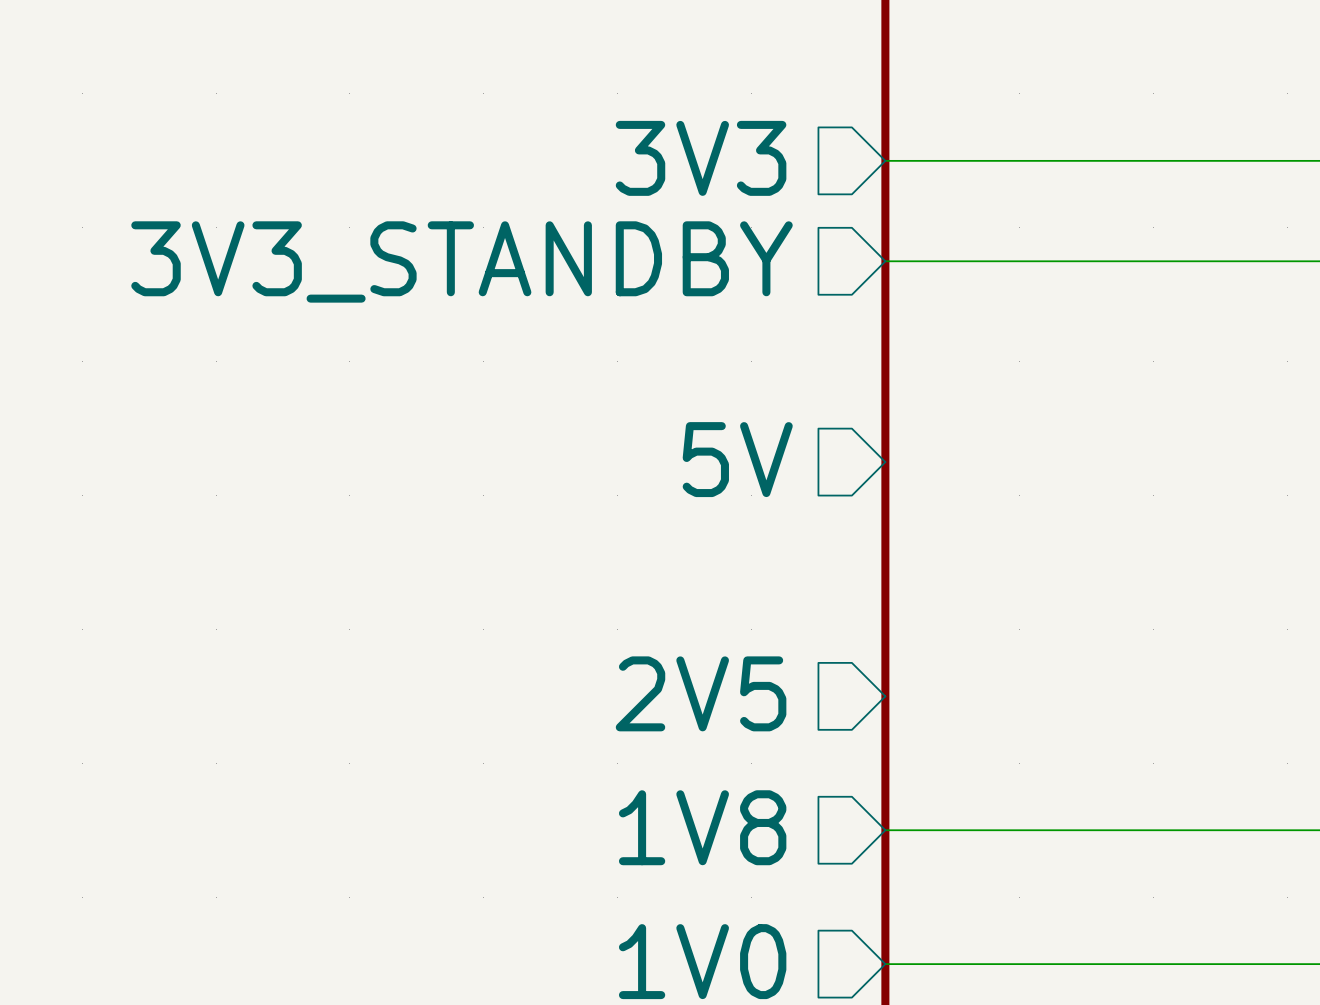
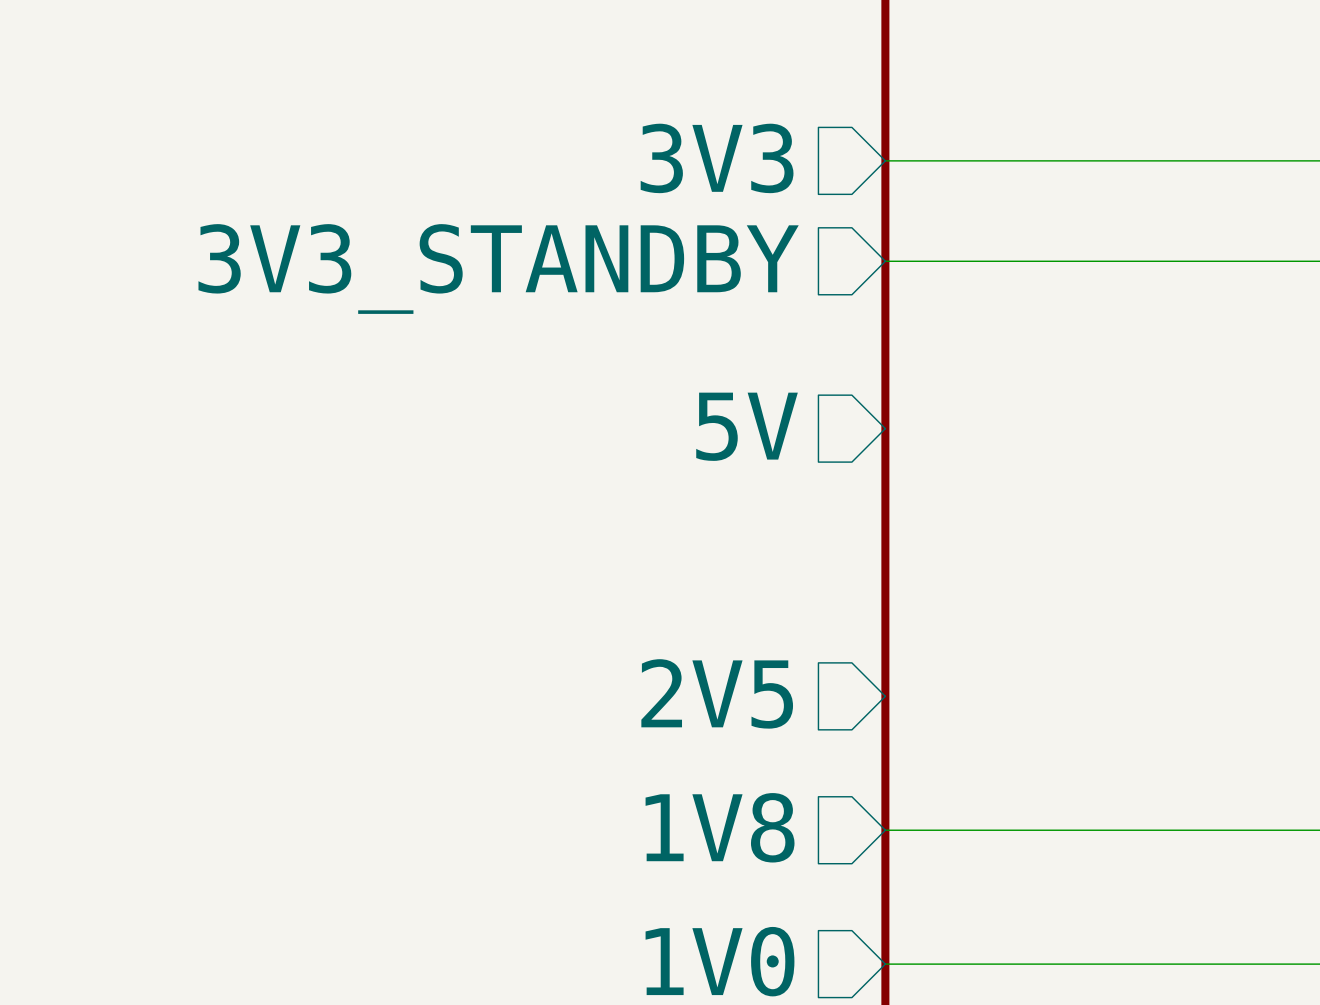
sheet pin position: 5V (737, 459) -> 5V (747, 426)

